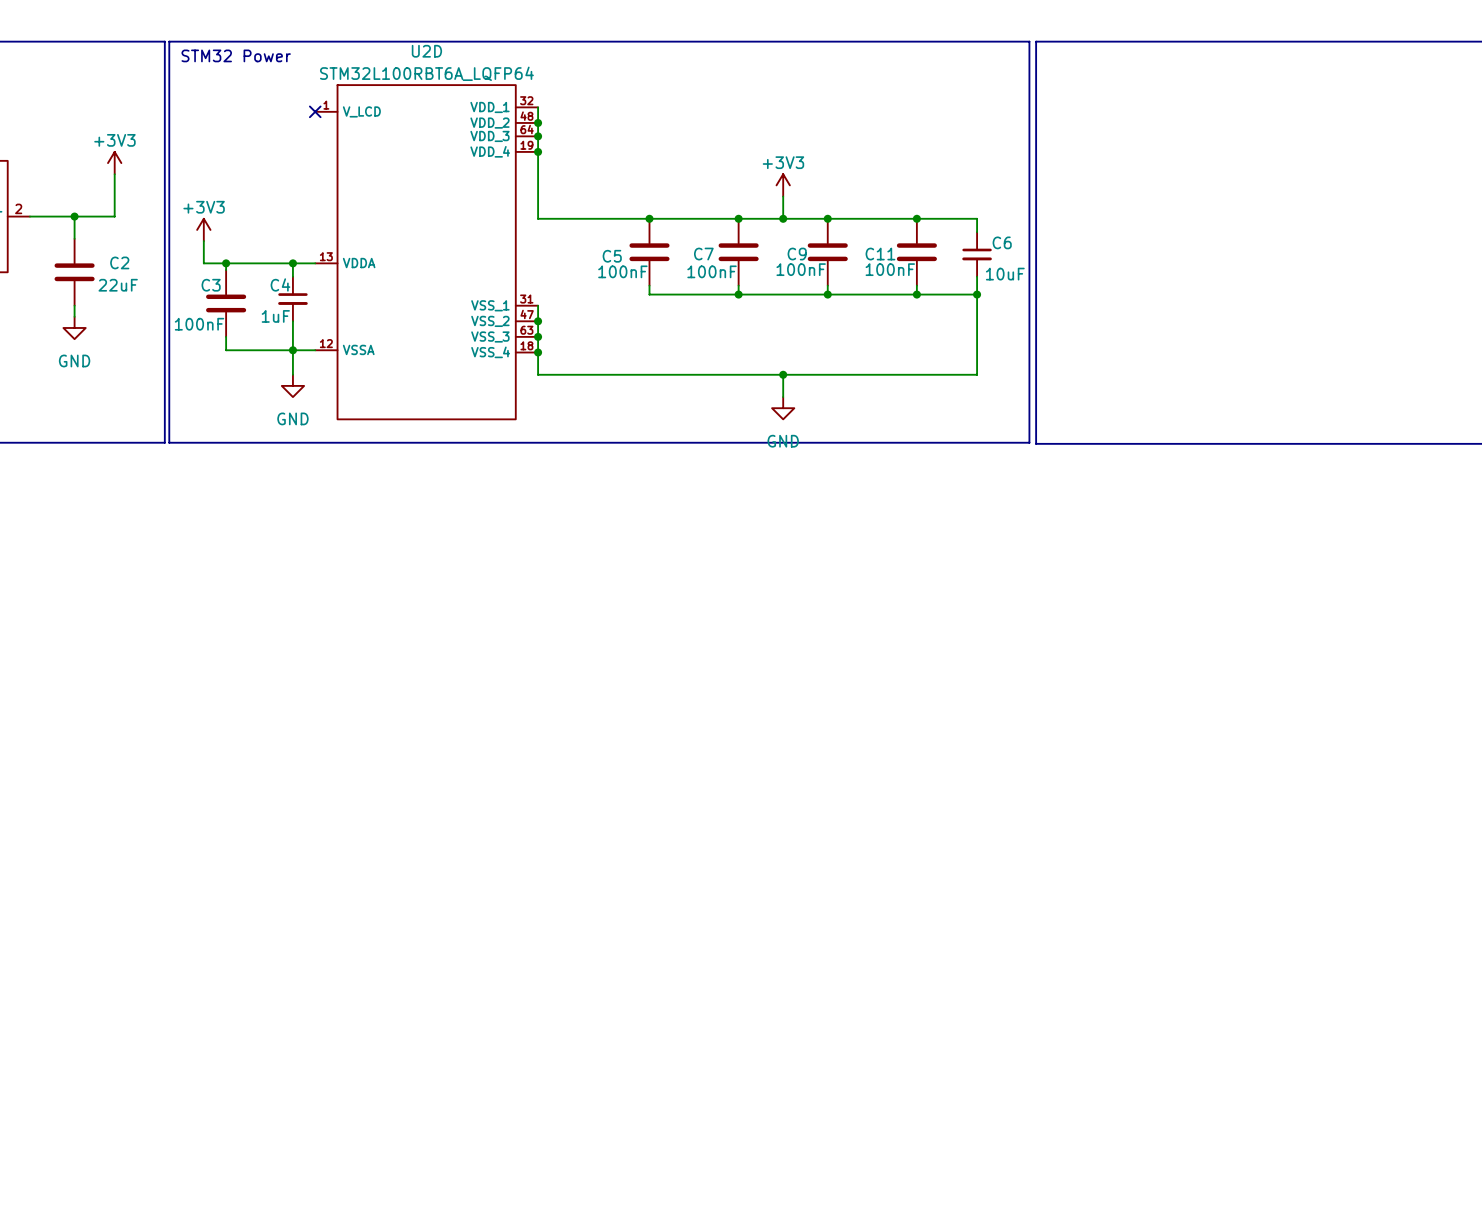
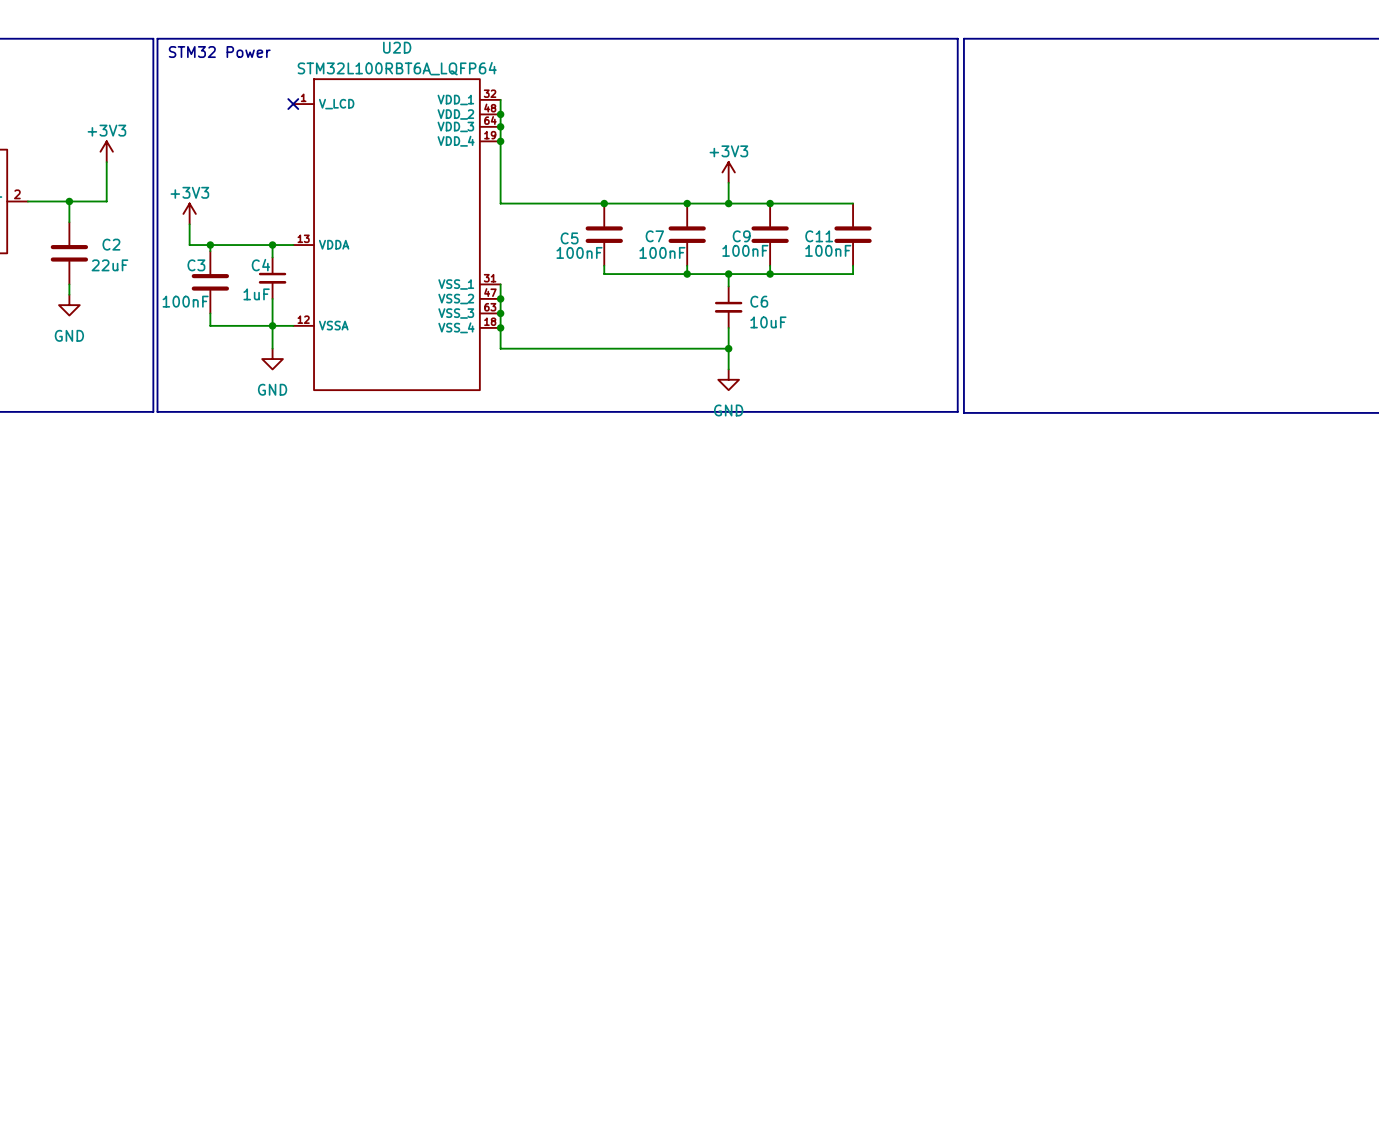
wire: (916, 218) (977, 218) (977, 232) -> none
junction: (916, 218) -> none
C6 name position: C6 (1002, 242) -> C6 (759, 301)
C6 position: (977, 254) -> (728, 307)
C6 value position: 10uF (1005, 274) -> 10uF (768, 322)
wire: (977, 276) (977, 374) (783, 374) -> (728, 327) (728, 348)
wire: none -> (728, 274) (728, 286)
junction: none -> (728, 274)
wire: (916, 294) (977, 294) -> none
junction: (916, 294) -> none
junction: (977, 294) -> none

